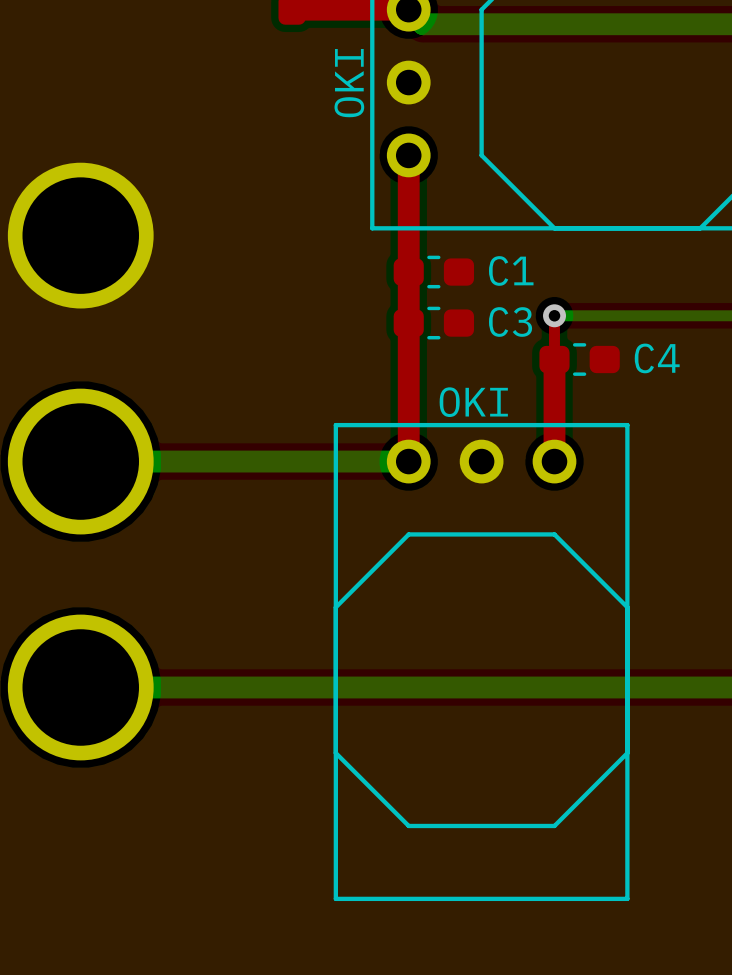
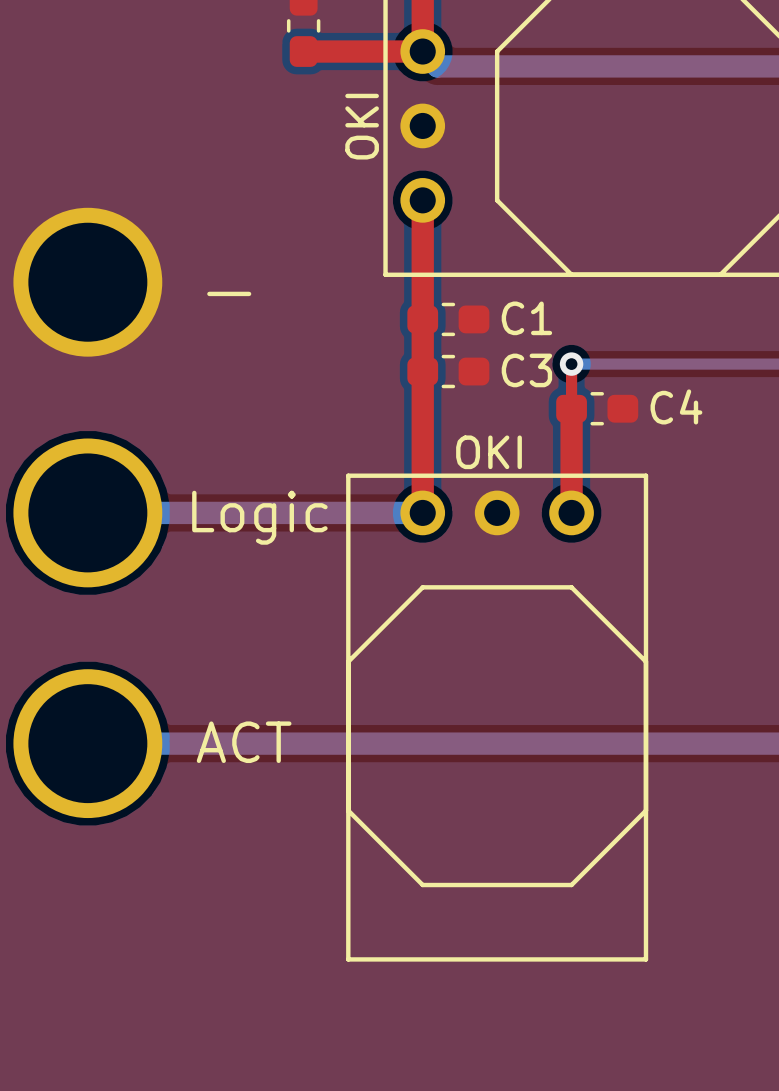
text: none -> - (229, 293)
text: none -> Logic (259, 517)
text: none -> ACT (244, 742)

